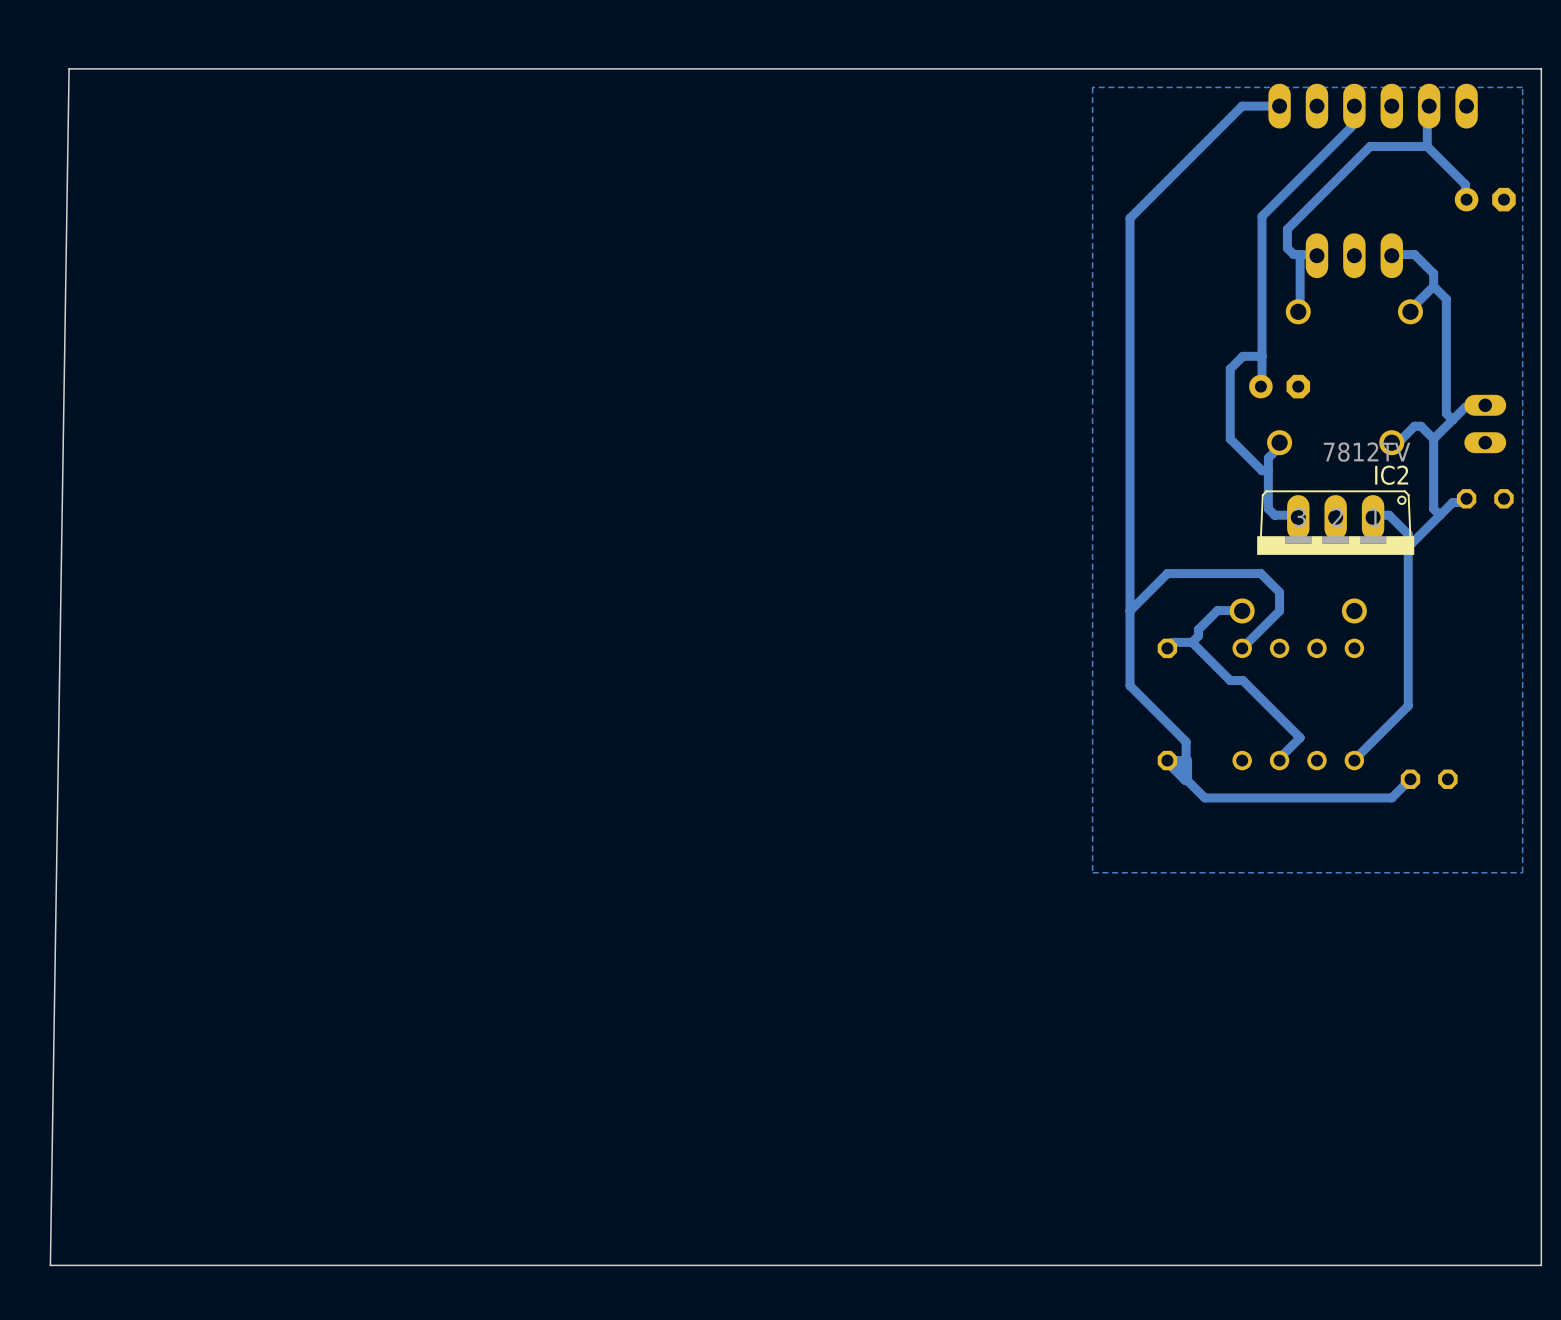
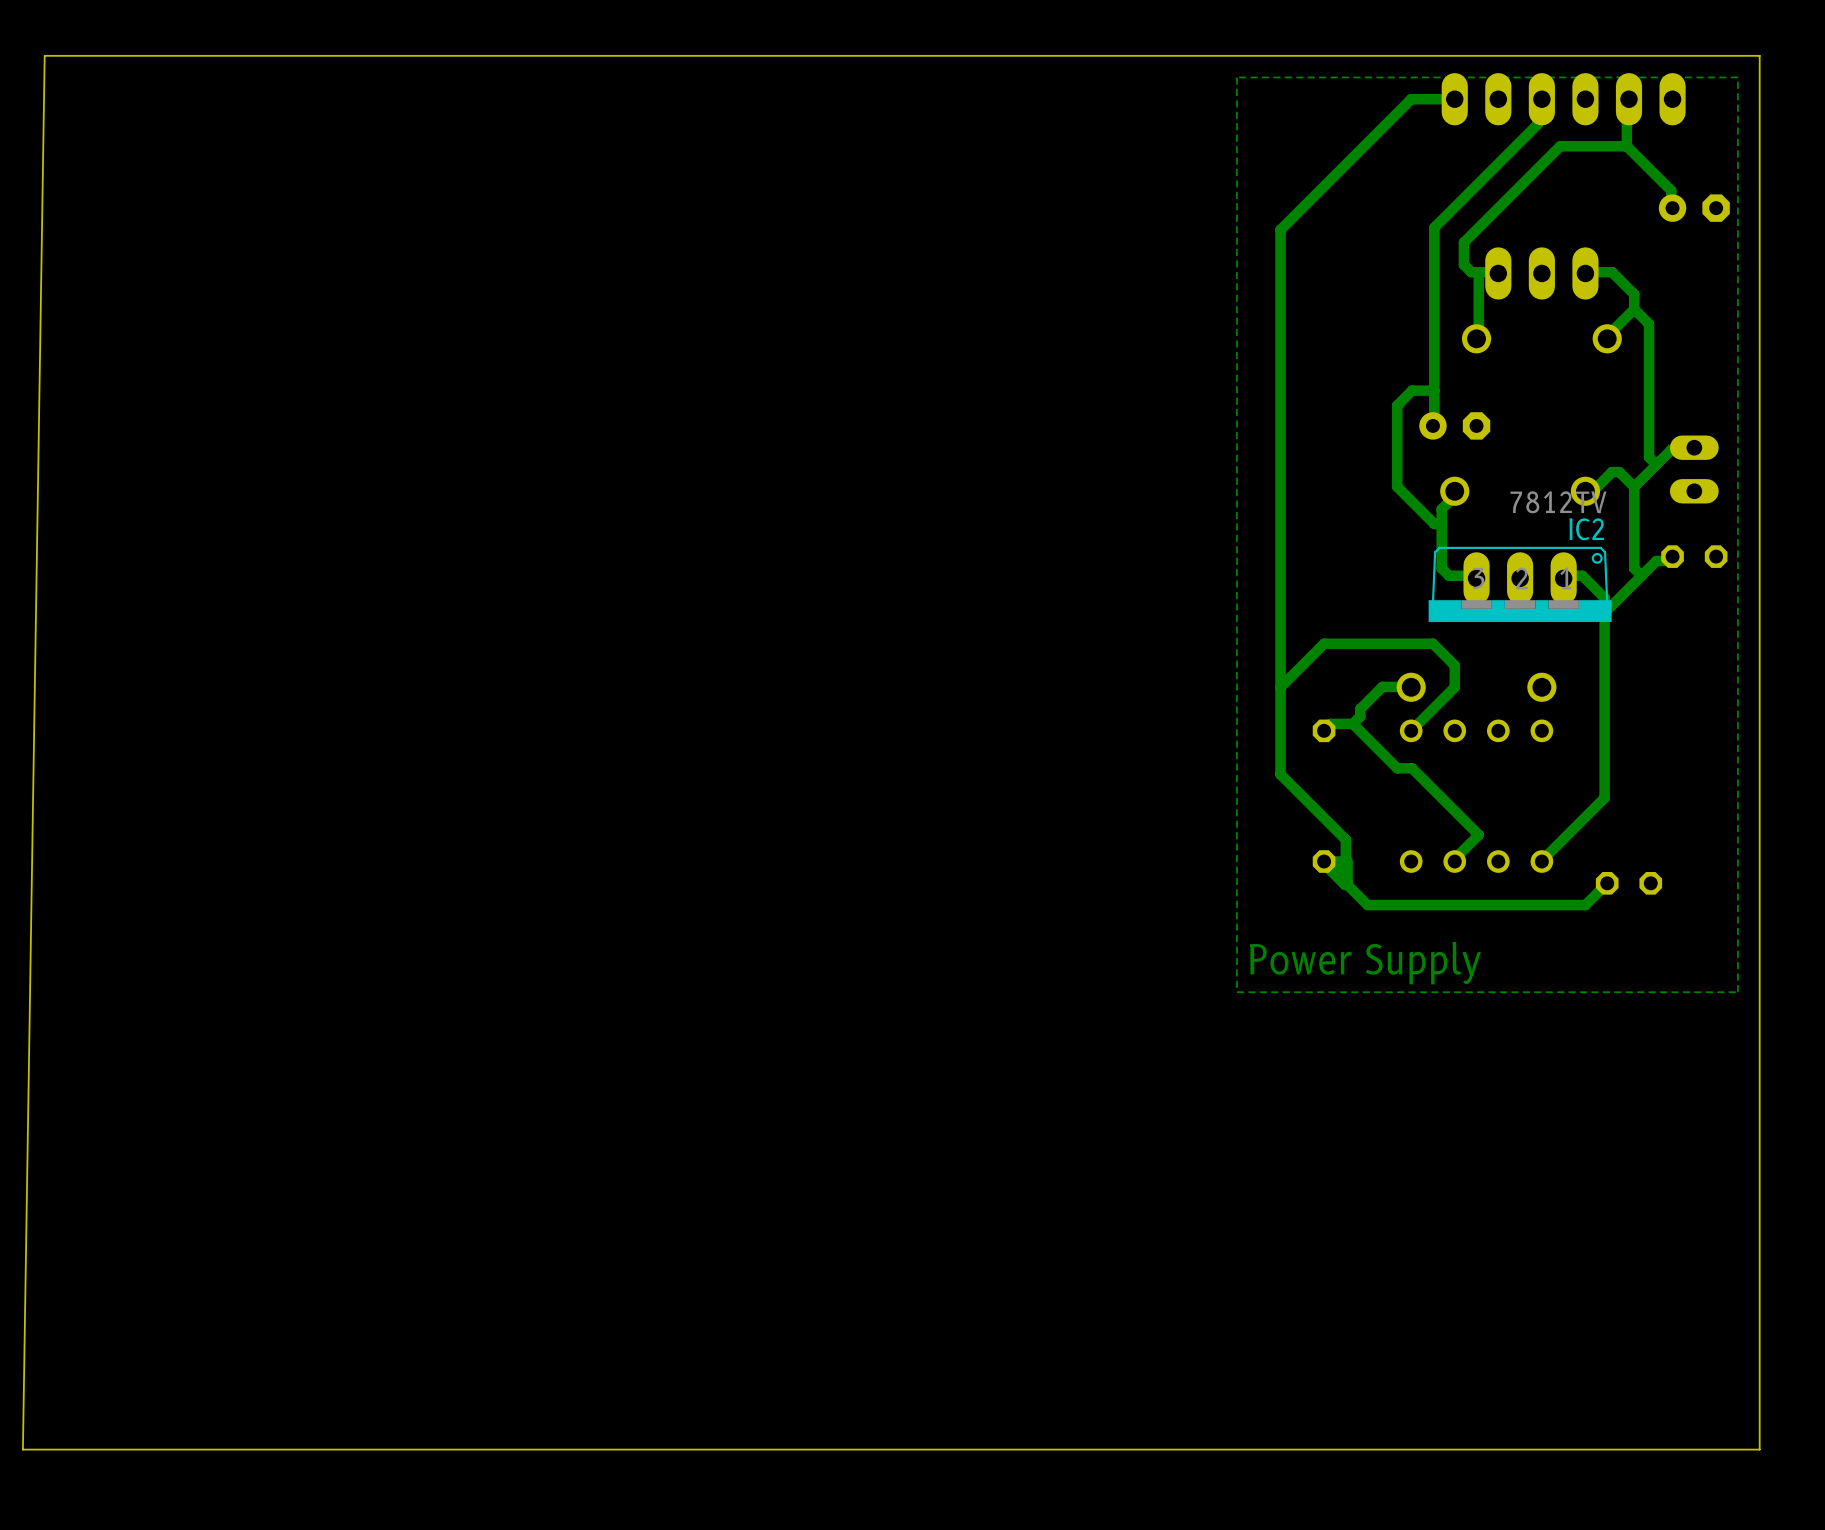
text: none -> Power Supply (1365, 963)

